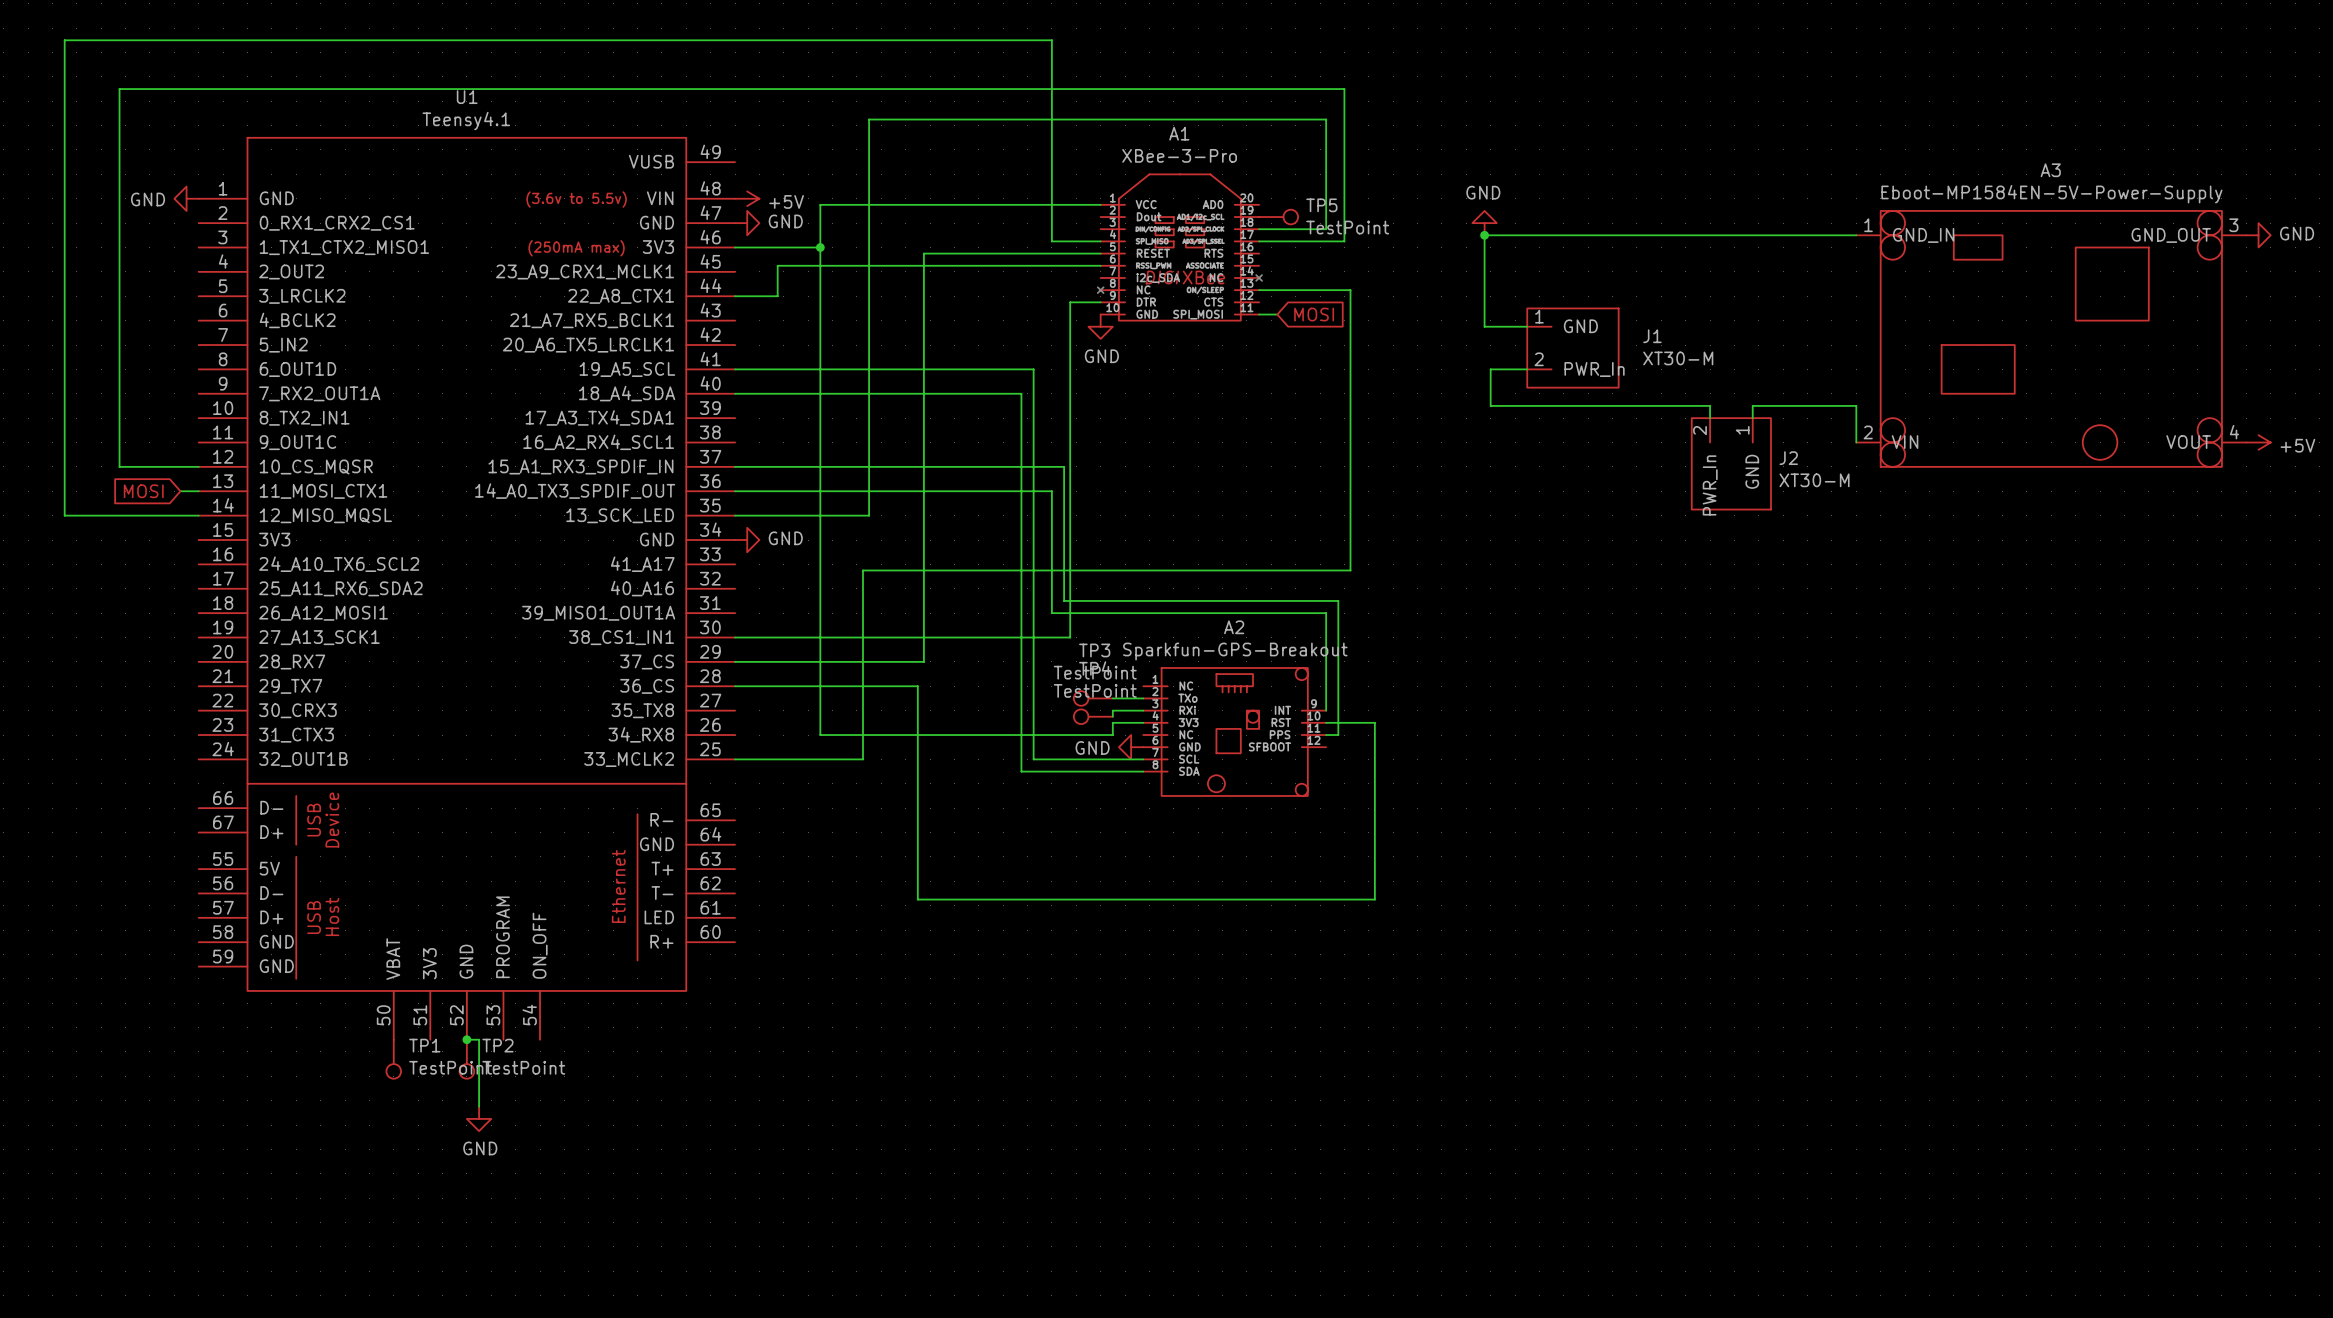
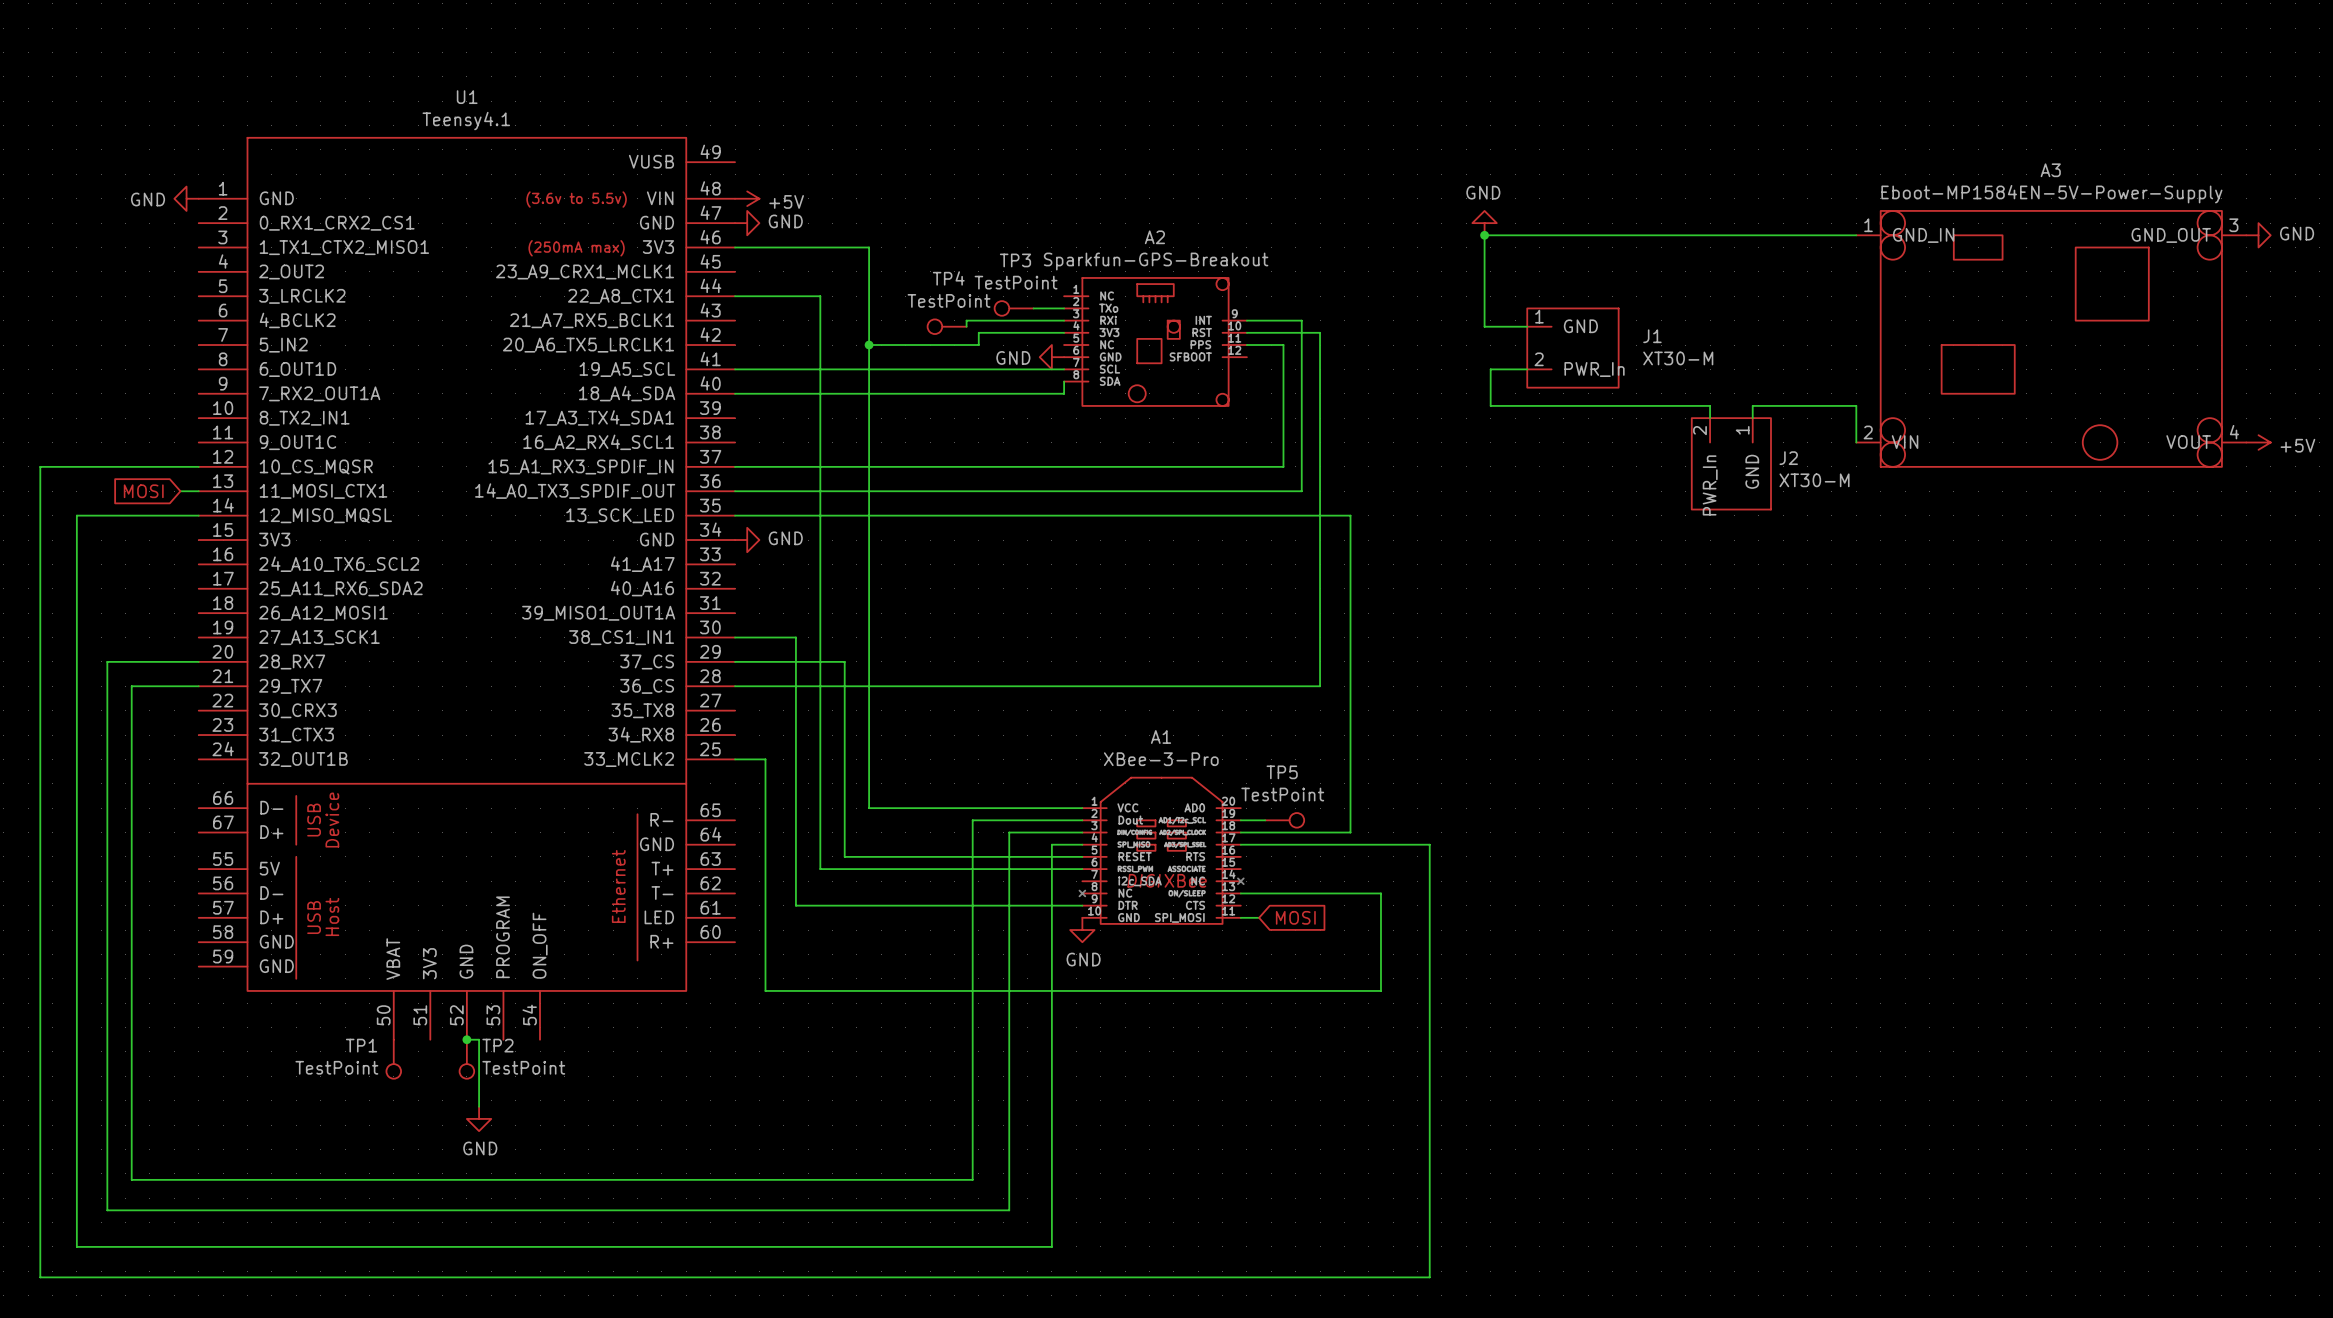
wire: (1100, 204) (820, 204) (820, 296) -> none
TP5 name position: TP5 (1321, 205) -> TP5 (1282, 772)
TP5 position: (1278, 217) -> (1284, 820)
TP5 value position: TestPoint (1347, 227) -> TestPoint (1282, 794)
wire: (1259, 229) (1326, 229) (1326, 119) (869, 119) (869, 247) -> (820, 247) (869, 247)
wire: (1100, 241) (1051, 241) (1051, 40) (64, 40) (64, 515) (76, 515) -> (1082, 844) (1051, 844) (1051, 1246) (76, 1246) (76, 515)
wire: (1259, 241) (1344, 241) (1344, 89) (119, 89) (119, 466) -> (1240, 844) (1429, 844) (1429, 1277) (40, 1277) (40, 466) (119, 466)
junction: (820, 247) -> none
A1 position: (1179, 247) -> (1161, 850)
wire: (1100, 253) (923, 253) (923, 661) (844, 661) -> (1082, 856) (844, 856) (844, 661)
wire: (1100, 265) (777, 265) (777, 296) -> (820, 296) (777, 296)
wire: (1259, 290) (1350, 290) (1350, 515) -> (1082, 808) (869, 808) (869, 515) (1350, 515)
wire: (1100, 302) (1070, 302) (1070, 637) (795, 637) -> (1082, 905) (795, 905) (795, 637)
wire: none -> (1033, 308) (1064, 308)
wire: (1259, 314) (1277, 314) -> none
global label: MOSI (1314, 314) -> none
wire: none -> (1064, 320) (966, 320) (966, 326)
power symbol rotation: 0° (1100, 326) -> 90° clockwise (1051, 357)
power symbol position: GND (1100, 326) -> GND (1051, 357)
wire: none -> (1064, 332) (978, 332) (978, 345) (869, 345)
junction: none -> (869, 345)
wire: (1033, 369) (1033, 759) (1143, 759) -> (1033, 369) (1064, 369)
wire: (1021, 393) (1021, 771) (1143, 771) -> (1021, 393) (1064, 393) (1064, 381)
wire: (1064, 466) (1064, 600) (1338, 600) (1338, 735) (1326, 735) -> (1064, 466) (1283, 466) (1283, 345) (1246, 345)
wire: (1051, 491) (1051, 613) (1326, 613) (1326, 710) -> (1051, 491) (1301, 491) (1301, 320) (1246, 320)
wire: (1350, 570) (862, 570) (862, 759) (765, 759) -> (1240, 893) (1380, 893) (1380, 990) (765, 990) (765, 759)
wire: none -> (1350, 570) (1350, 832) (1240, 832)
wire: none -> (198, 661) (107, 661) (107, 1210) (1009, 1210) (1009, 832) (1082, 832)
wire: none -> (198, 686) (131, 686) (131, 1179) (972, 1179) (972, 820) (1082, 820)
wire: (917, 686) (917, 899) (1374, 899) (1374, 722) (1326, 722) -> (917, 686) (1320, 686) (1320, 332) (1246, 332)
TP3 position: (1093, 698) -> (1014, 308)
wire: (1112, 698) (1143, 698) -> none
wire: (1143, 710) (1112, 710) (1112, 716) -> none
TP4 position: (1093, 716) -> (947, 326)
wire: (1143, 722) (1112, 722) (1112, 735) (820, 735) -> (1082, 869) (820, 869) (820, 735)
A2 position: (1234, 731) -> (1155, 341)
power symbol rotation: 0° (1131, 747) -> 90° counterclockwise (1082, 930)
power symbol position: GND (1131, 747) -> GND (1082, 930)
wire: none -> (1240, 820) (1265, 820)
wire: none -> (1240, 917) (1259, 917)
global label: none -> MOSI (1295, 917)
TP1 name position: TP1 (424, 1045) -> TP1 (361, 1045)
TP1 value position: TestPoint (450, 1067) -> TestPoint (336, 1067)

